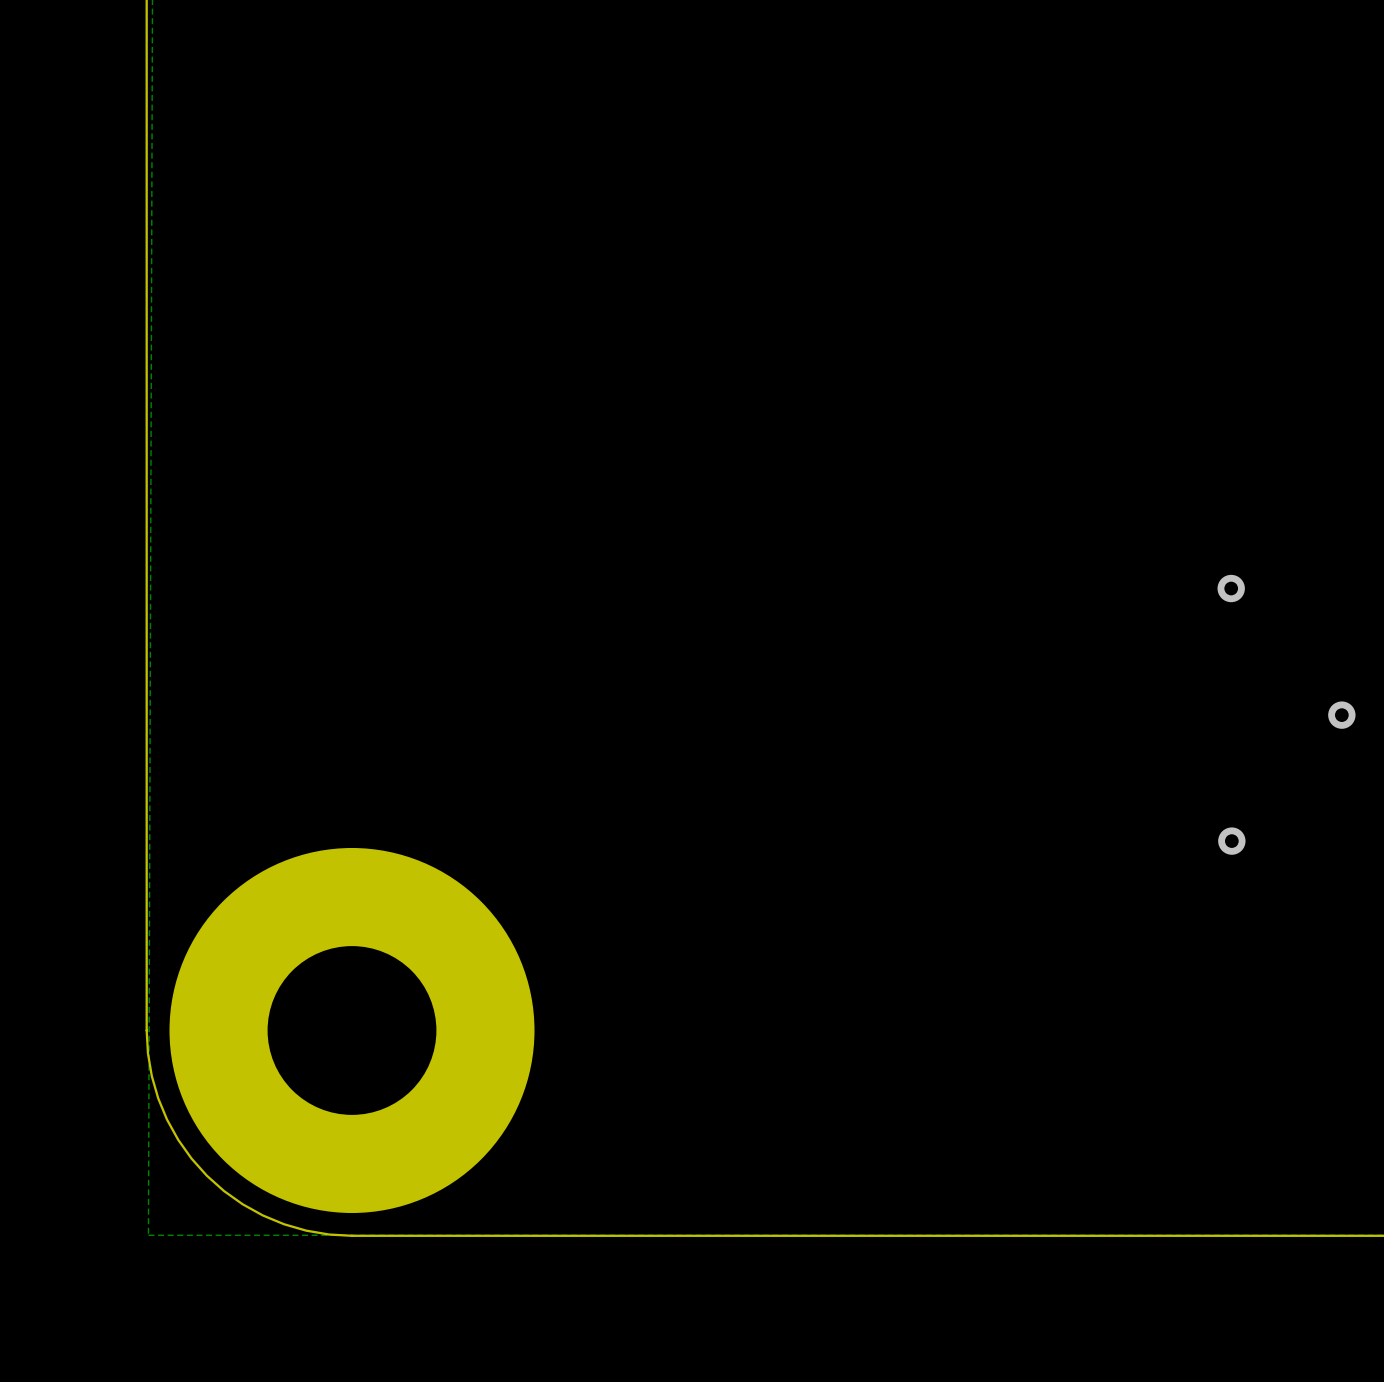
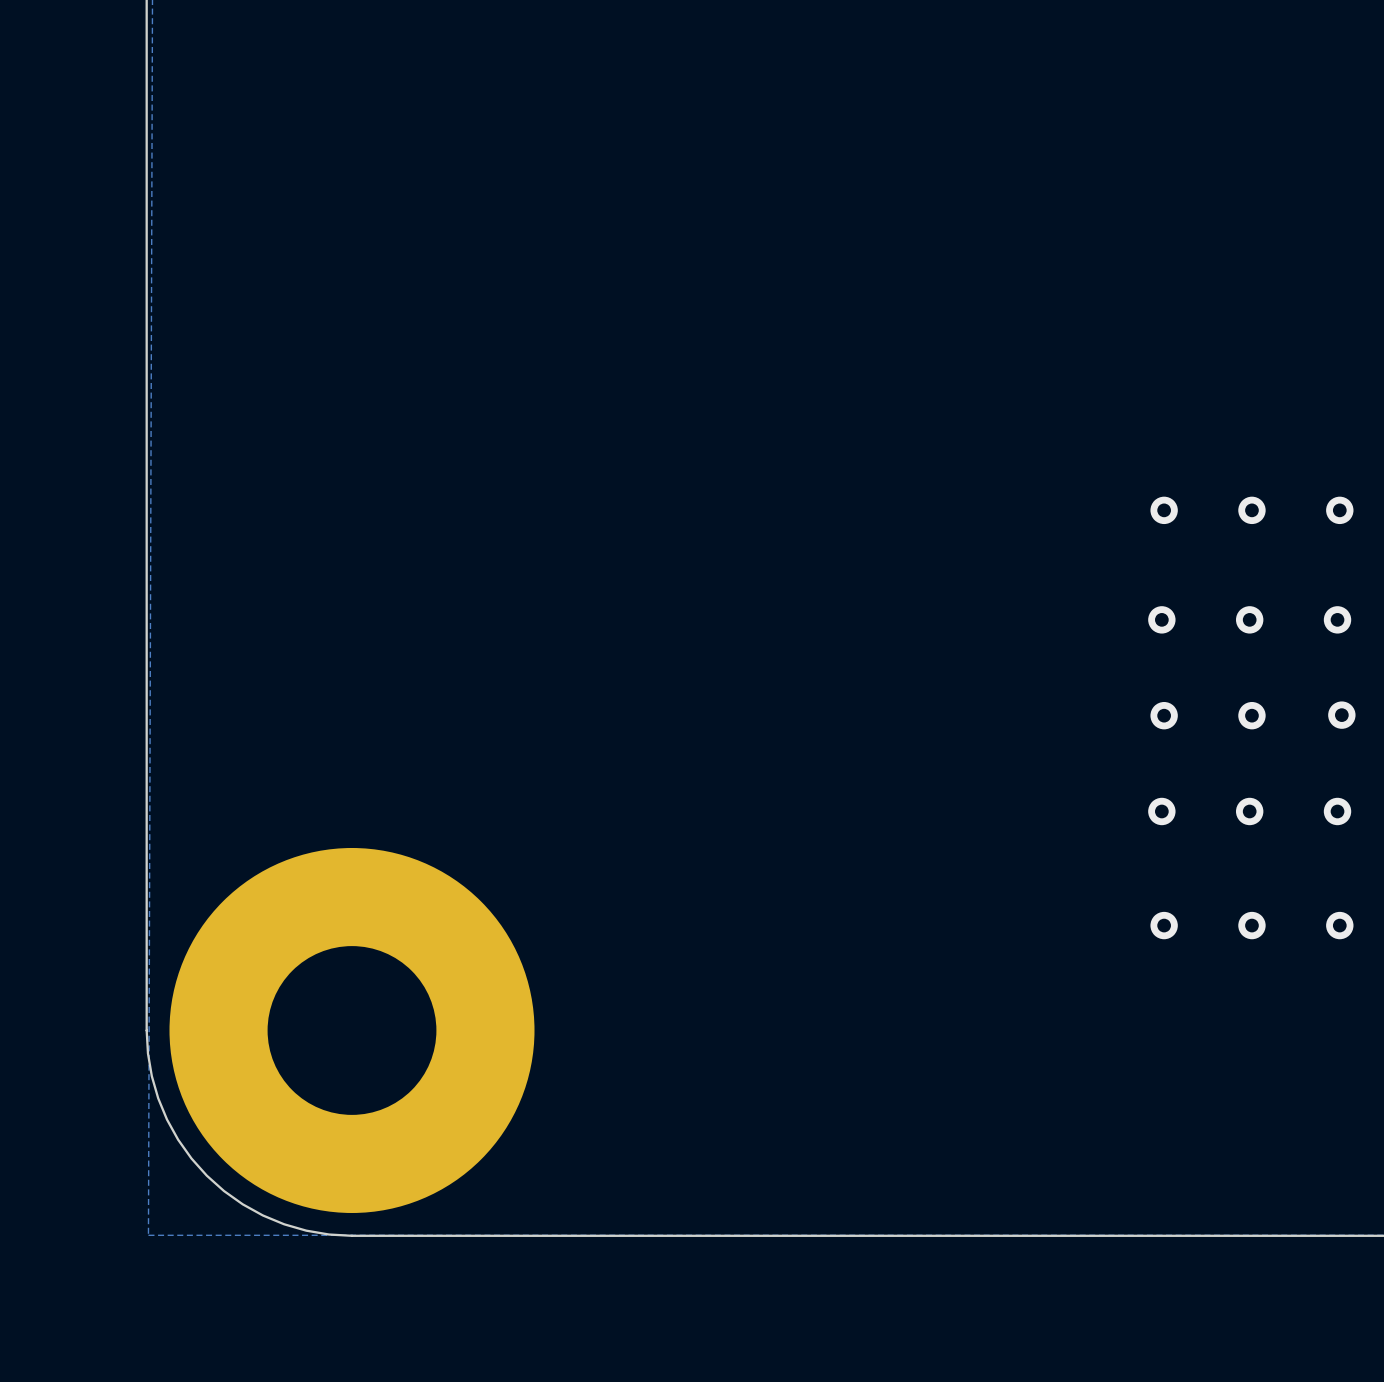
via: none -> (1164, 510)
via: none -> (1251, 510)
via: none -> (1339, 510)
via position: (1231, 588) -> (1249, 619)
via: none -> (1161, 619)
via: none -> (1337, 619)
via: none -> (1164, 715)
via: none -> (1251, 715)
via: none -> (1161, 811)
via: none -> (1337, 811)
via position: (1231, 841) -> (1249, 811)
via: none -> (1164, 925)
via: none -> (1251, 925)
via: none -> (1339, 925)

